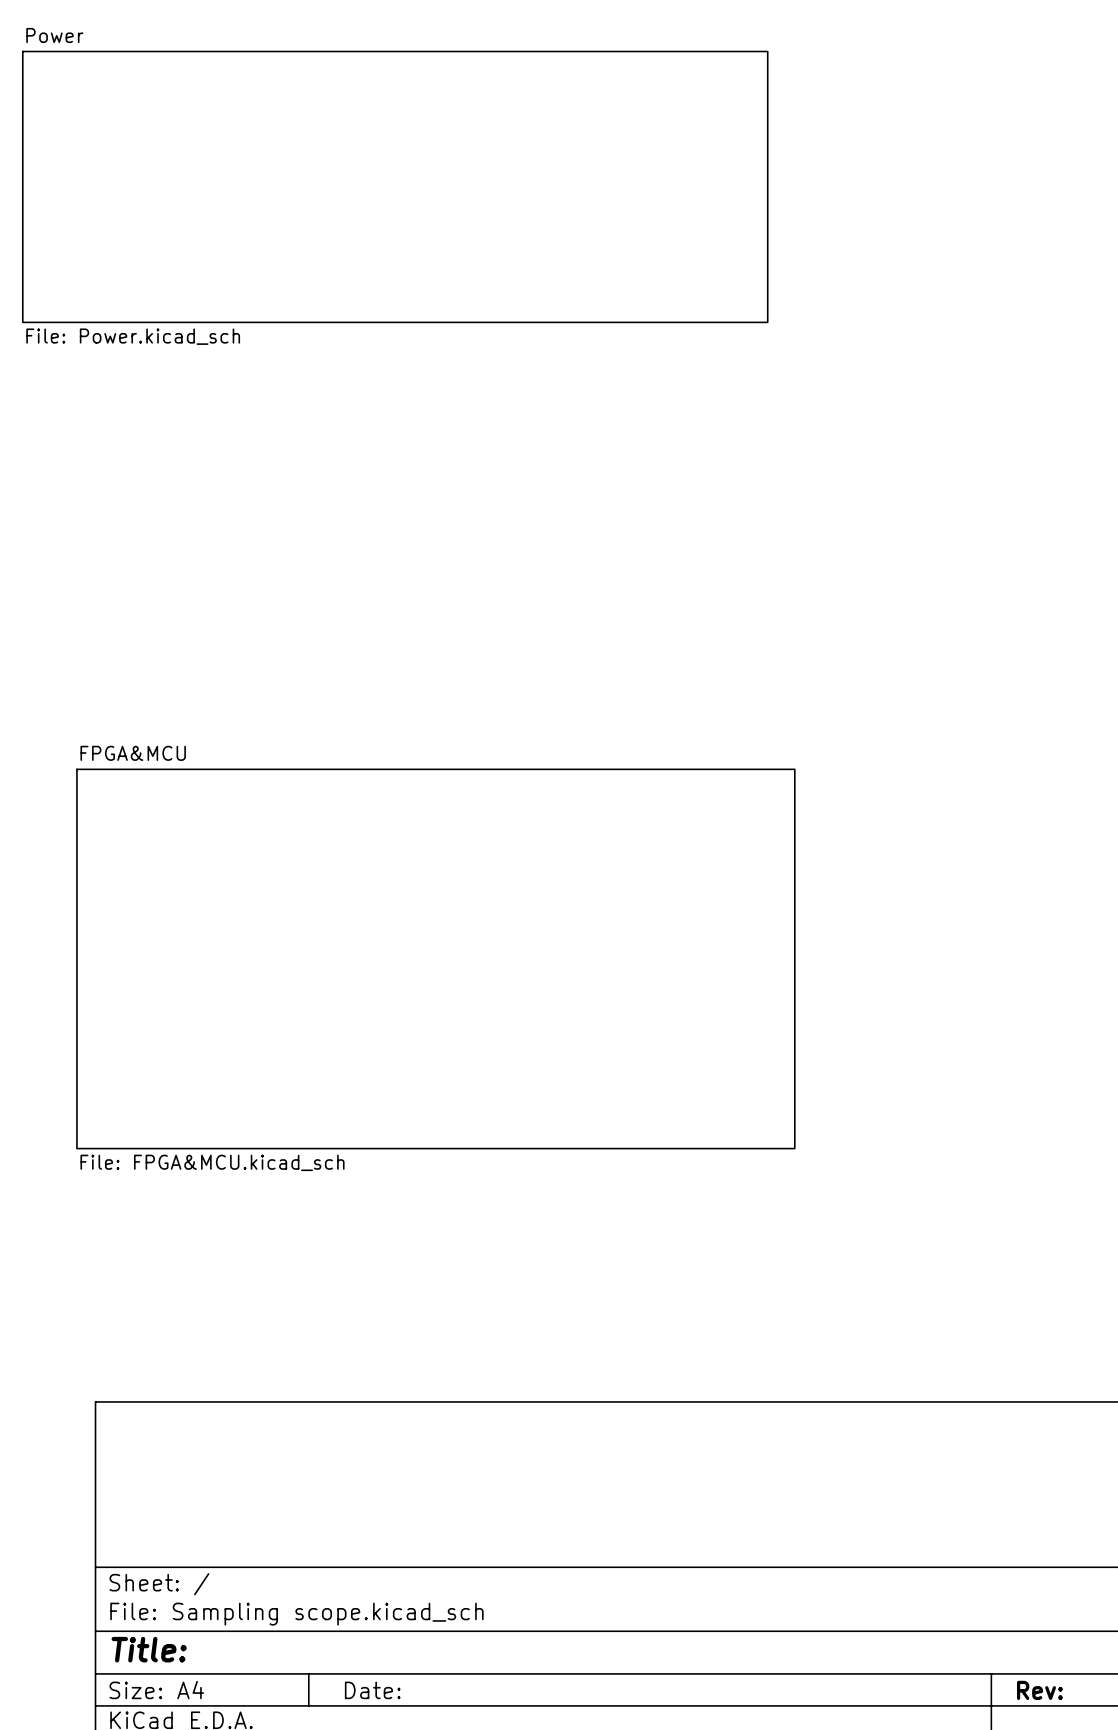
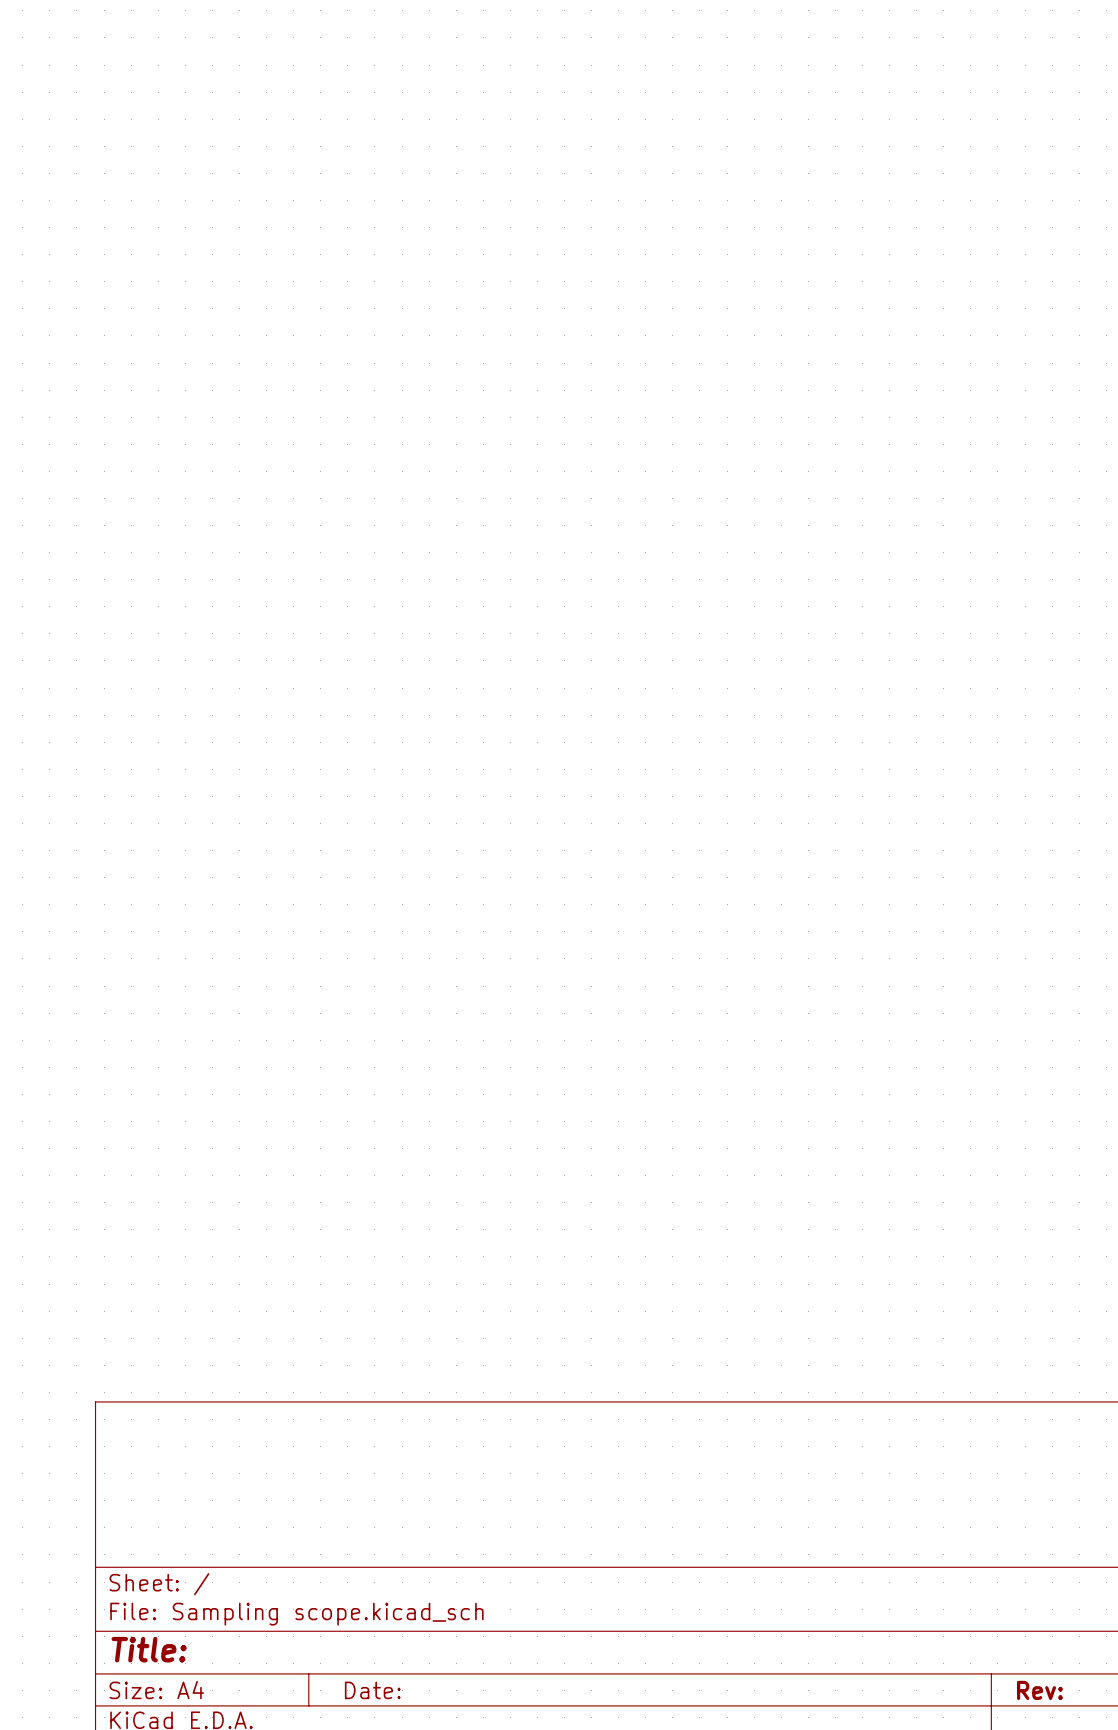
sheet Power: File: Power.kicad_sch (395, 186) -> none
sheet FPGA&MCU: File: FPGA&MCU.kicad_sch (435, 958) -> none

